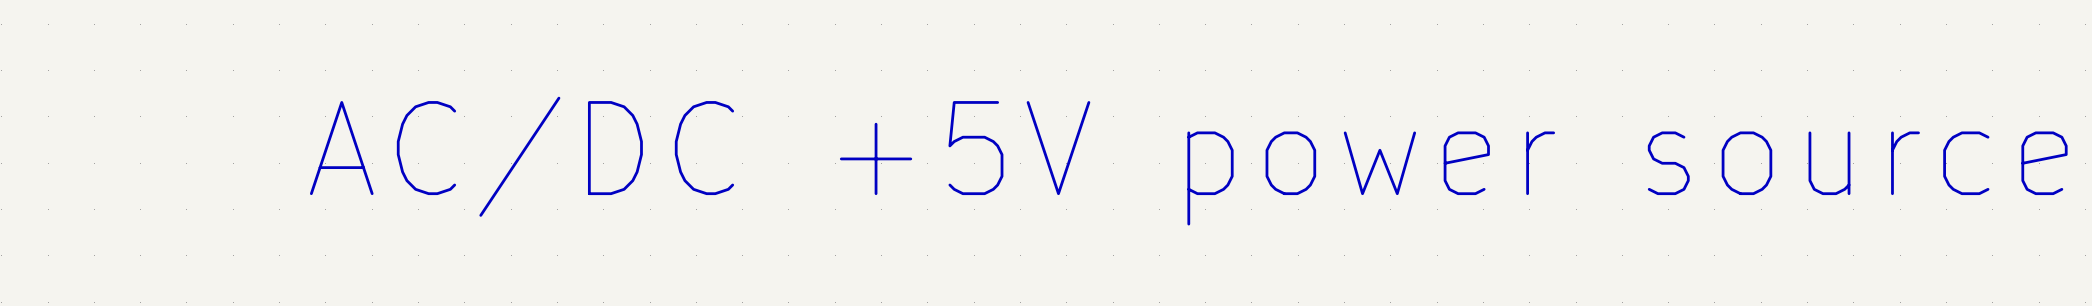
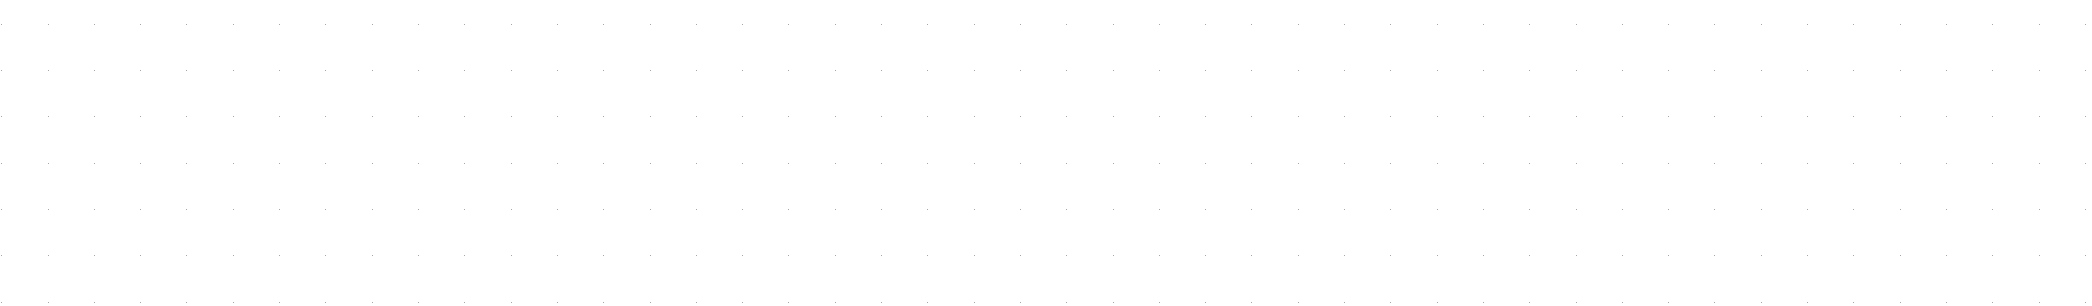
text: AC/DC +5V power source (1188, 161) -> none

